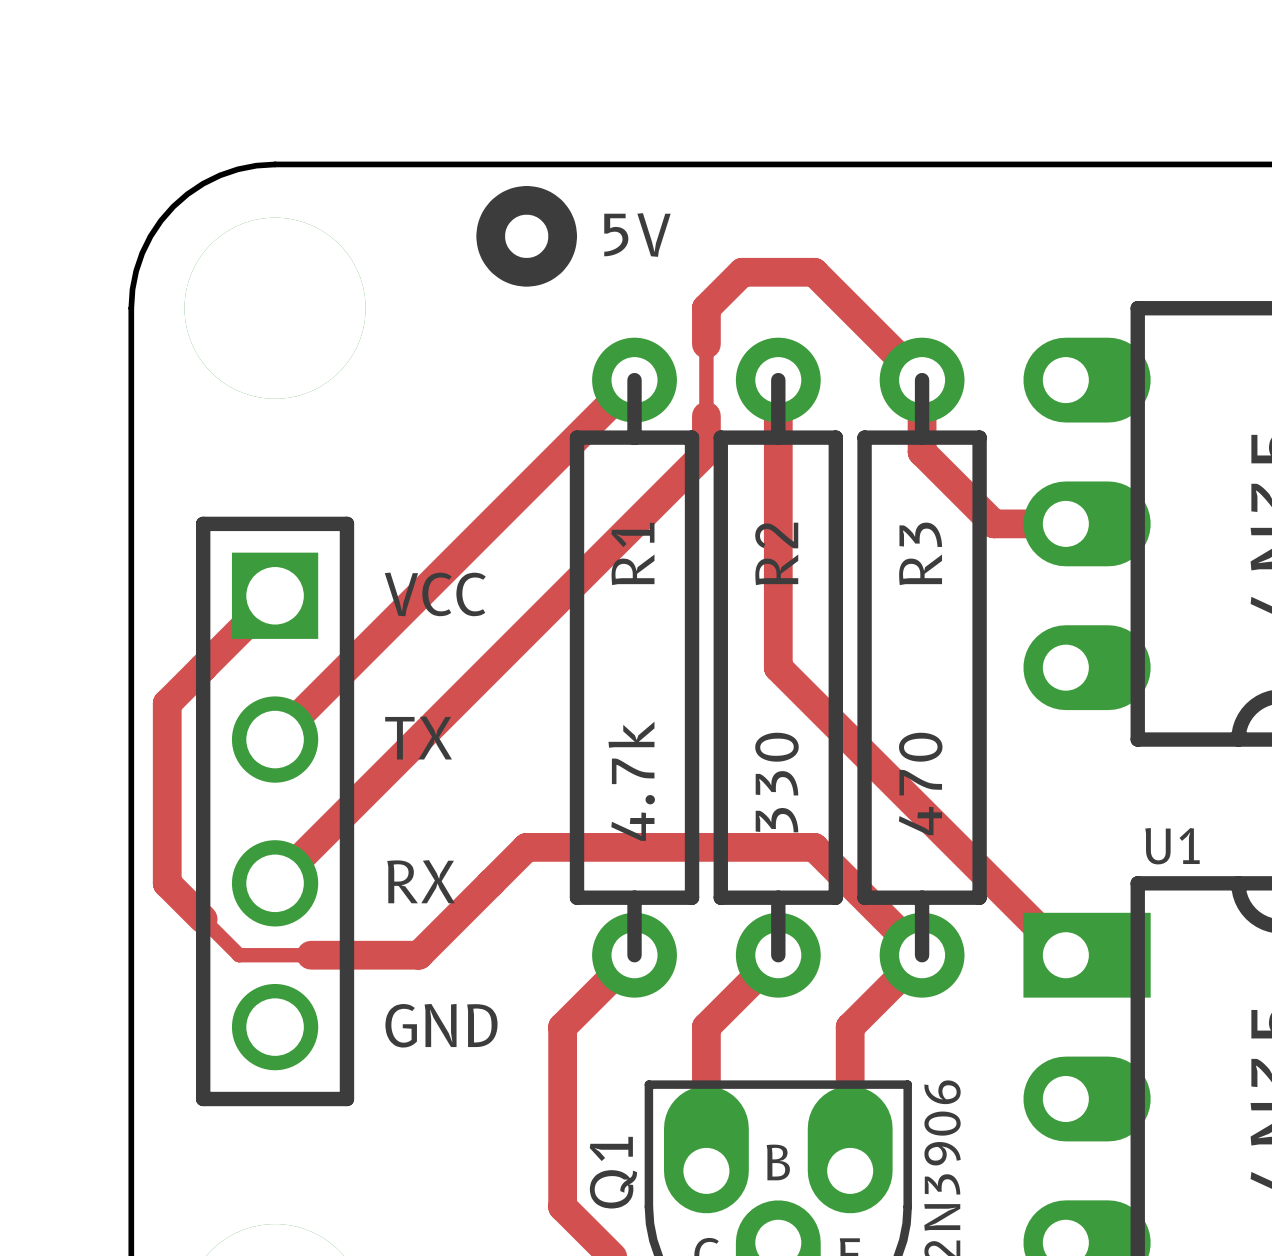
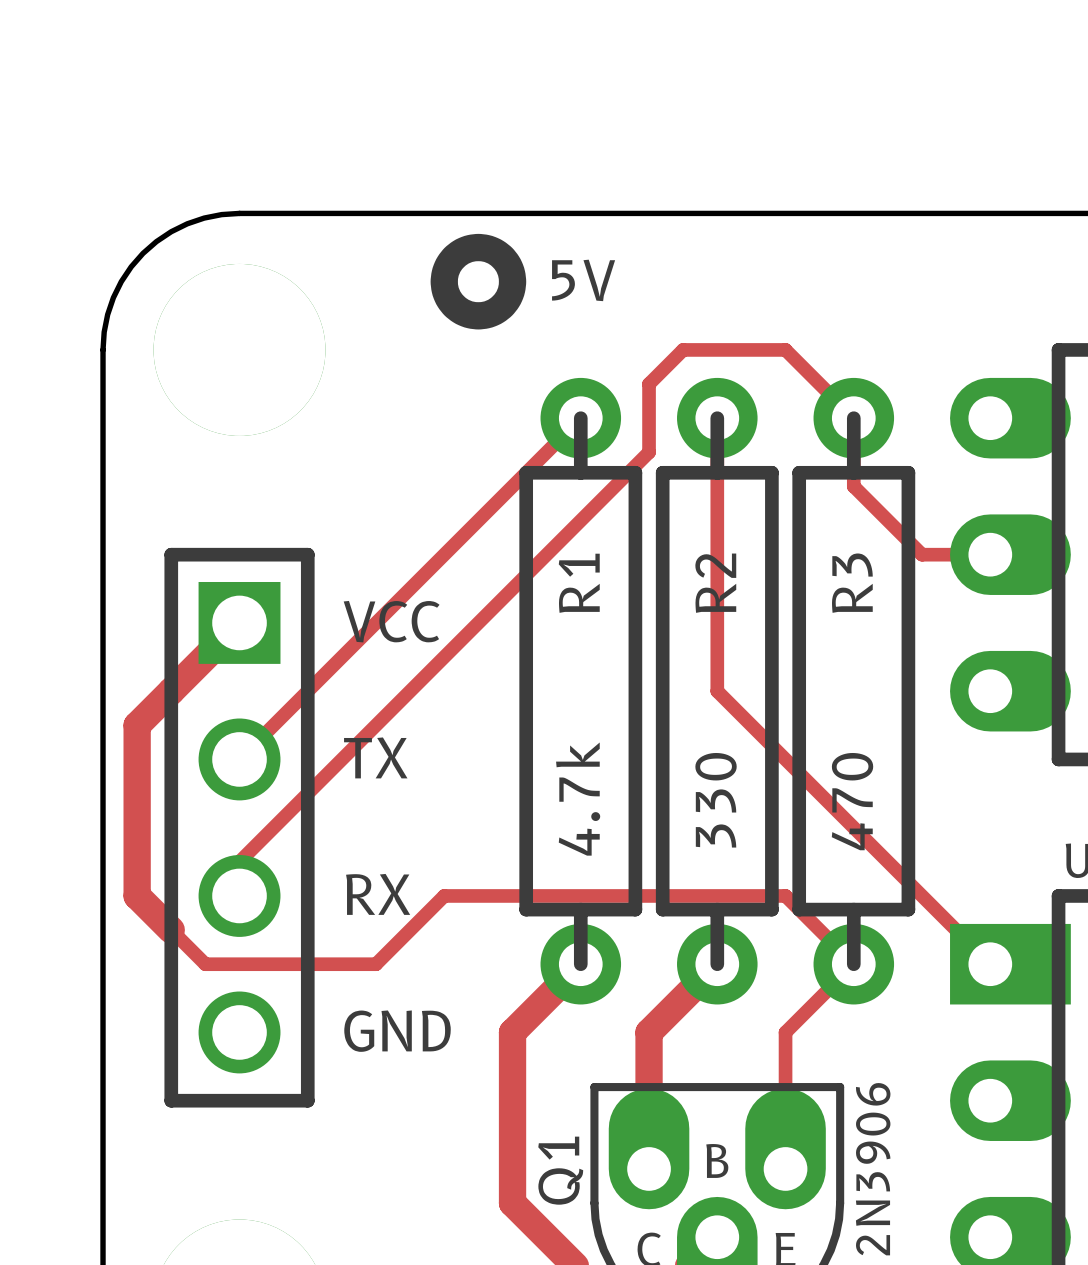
track: (850, 308) (814, 272) (742, 272) (706, 308) (706, 344) -> (785, 349) (683, 349) (649, 384)
track width: thick (850, 308) (922, 380) (922, 451) (993, 523) (1065, 523) -> thin (785, 349) (853, 418) (853, 486) (922, 554) (990, 554)
track width: thick (634, 380) (275, 739) -> thin (580, 418) (239, 759)
track width: thick (778, 380) (778, 667) (1065, 955) -> thin (717, 418) (717, 691) (990, 964)
track: (706, 416) (706, 451) (275, 883) -> (649, 452) (239, 861) (239, 895)
track: (490, 883) (526, 847) (814, 847) (850, 883) -> (444, 895) (785, 895)
track width: thick (490, 883) (418, 955) (311, 955) -> thin (444, 895) (376, 964) (273, 964)
track width: thick (850, 883) (922, 955) (850, 1027) (850, 1170) -> thin (785, 895) (853, 964) (785, 1032) (785, 1168)

